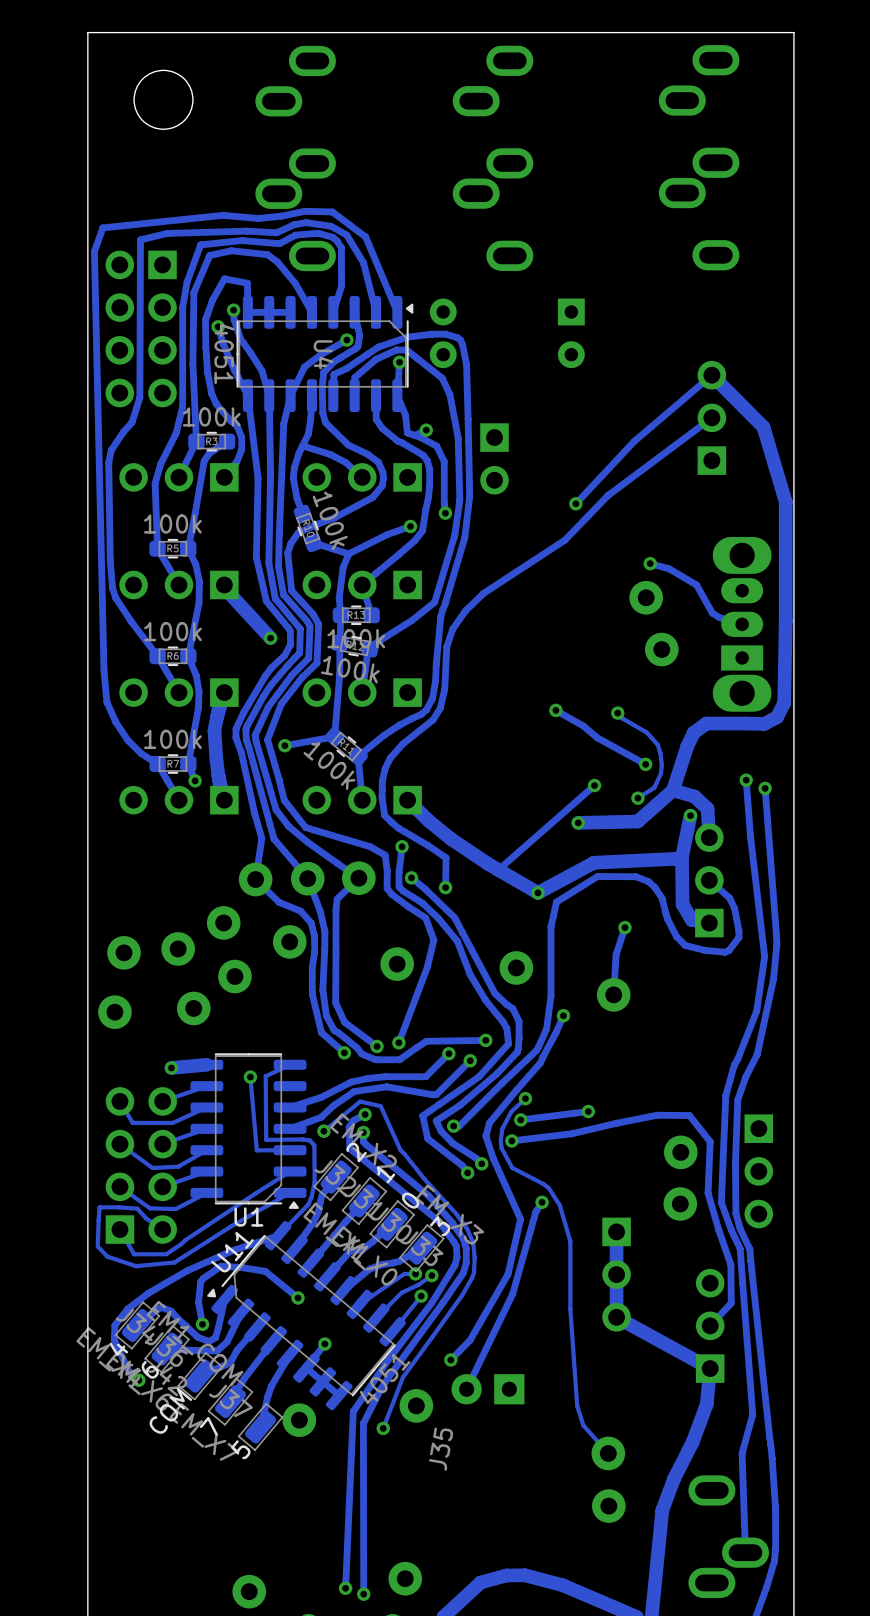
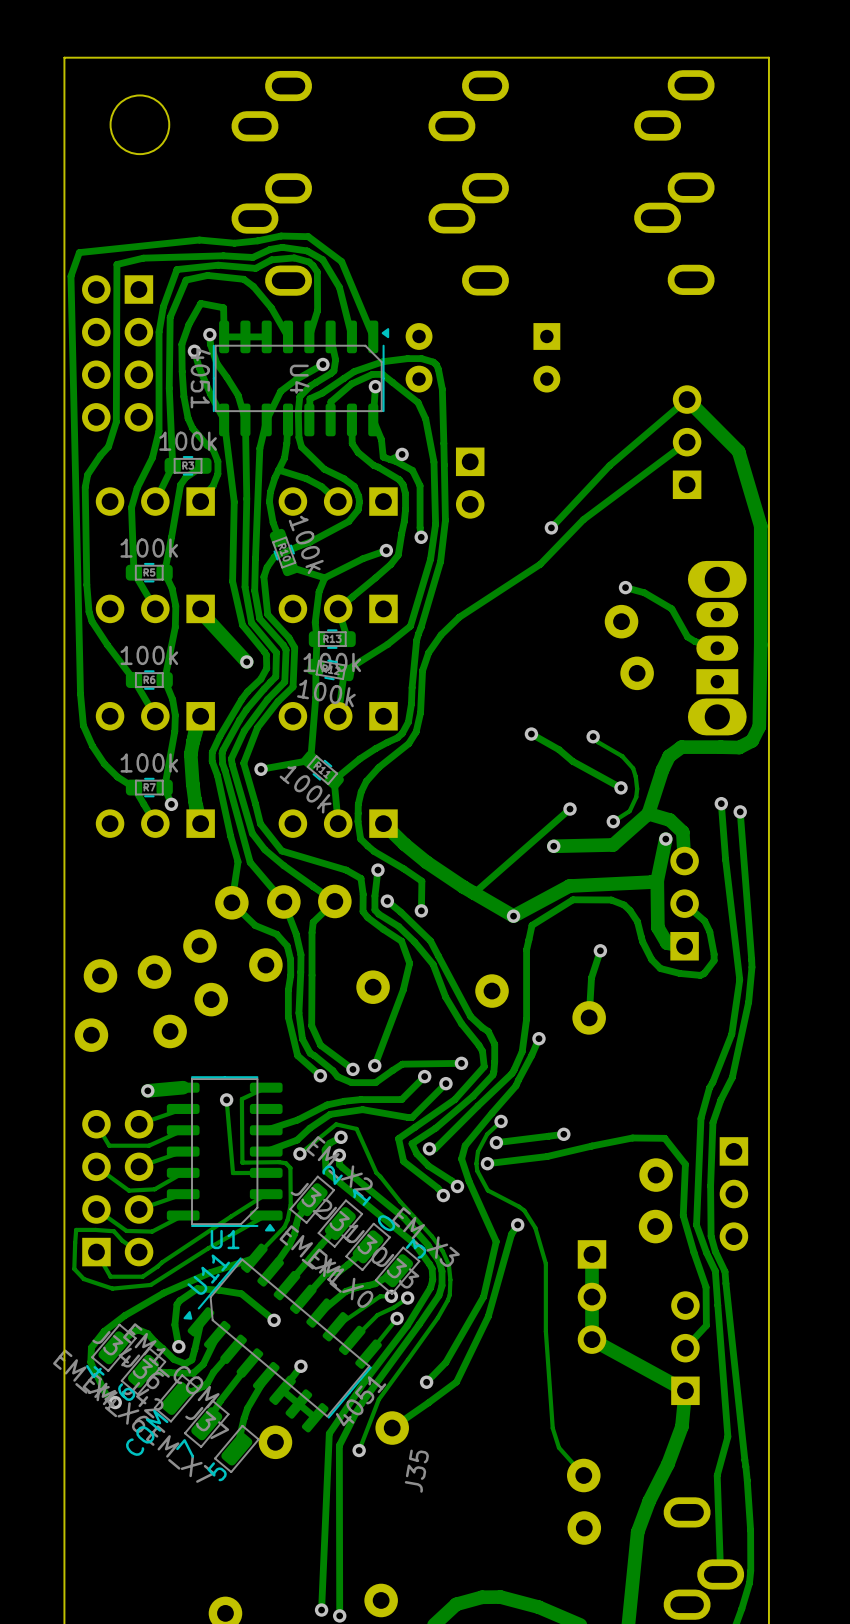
track: (480, 1359) (466, 1389) -> (456, 1382) (392, 1428)
part: (487, 1389) -> none

